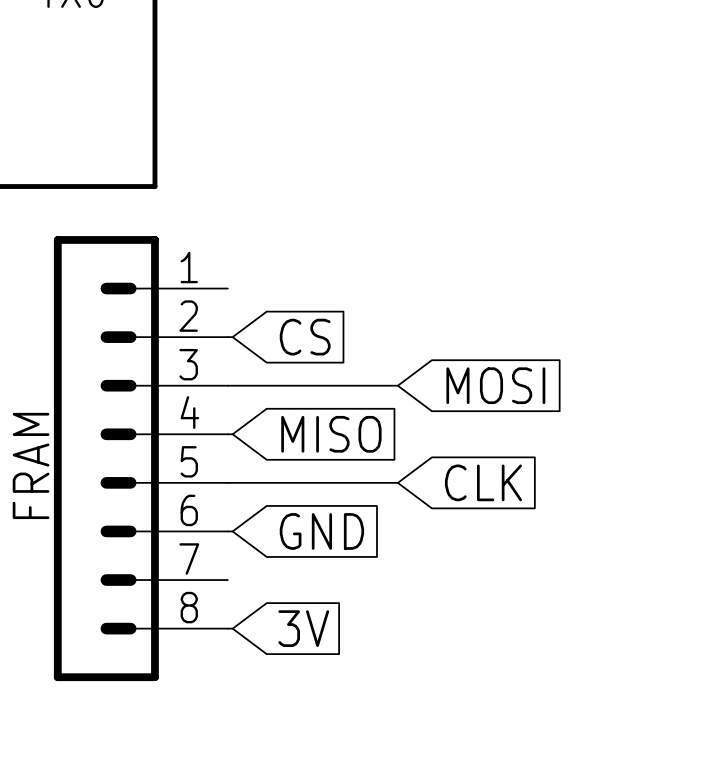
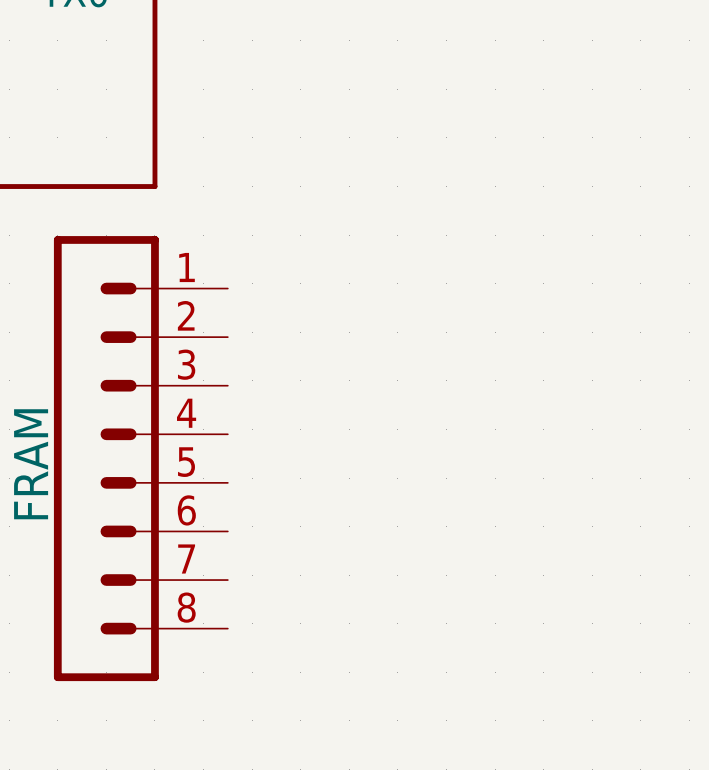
wire: (227, 337) (232, 337) -> none
global label: CS (305, 337) -> none
wire: (227, 385) (397, 385) -> none
global label: MOSI (495, 385) -> none
wire: (227, 434) (232, 434) -> none
global label: MISO (331, 434) -> none
wire: (227, 482) (397, 482) -> none
global label: CLK (483, 482) -> none
wire: (227, 531) (232, 531) -> none
global label: GND (321, 531) -> none
wire: (227, 628) (232, 628) -> none
global label: 3V (303, 628) -> none

